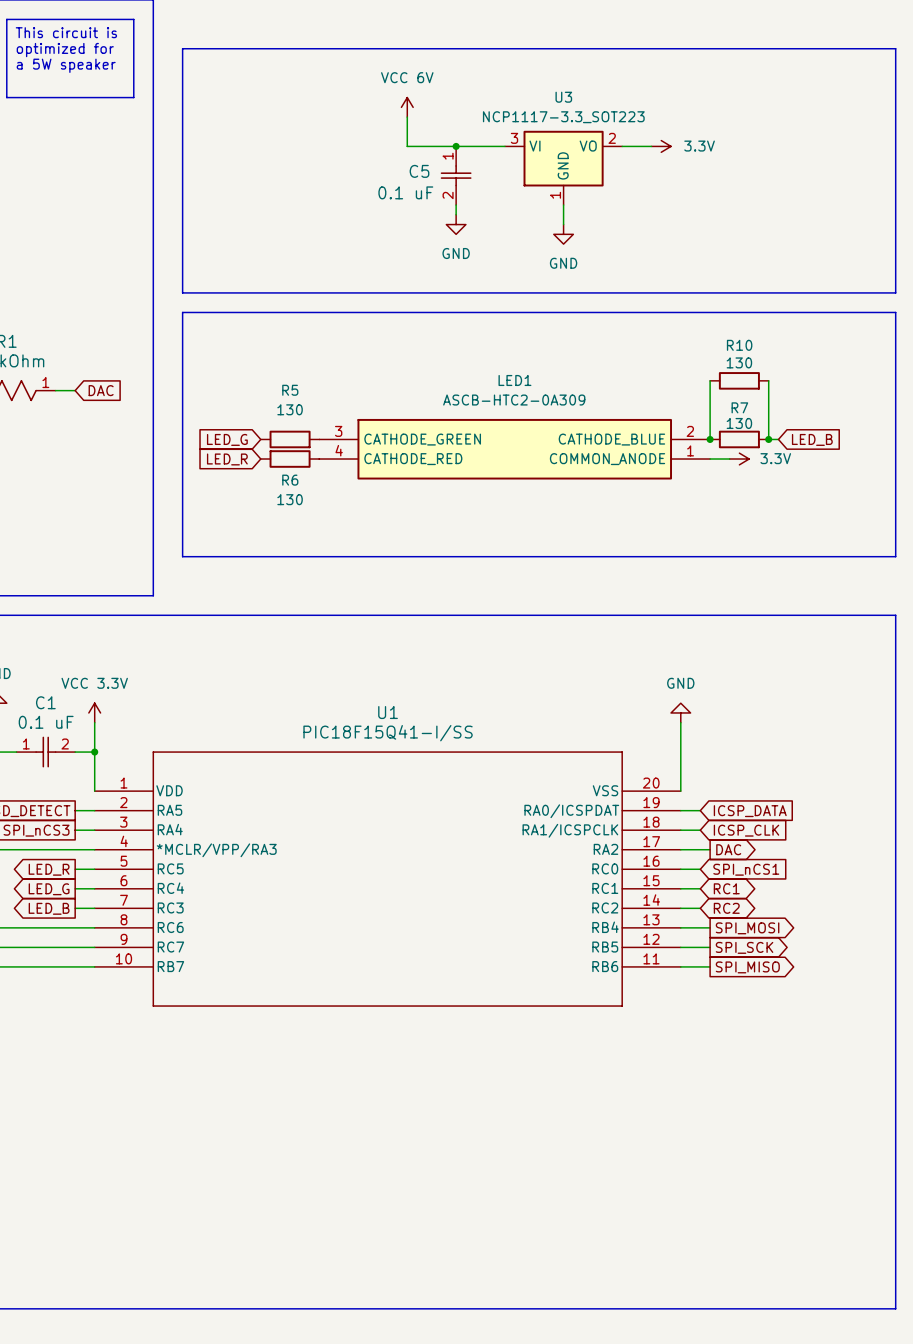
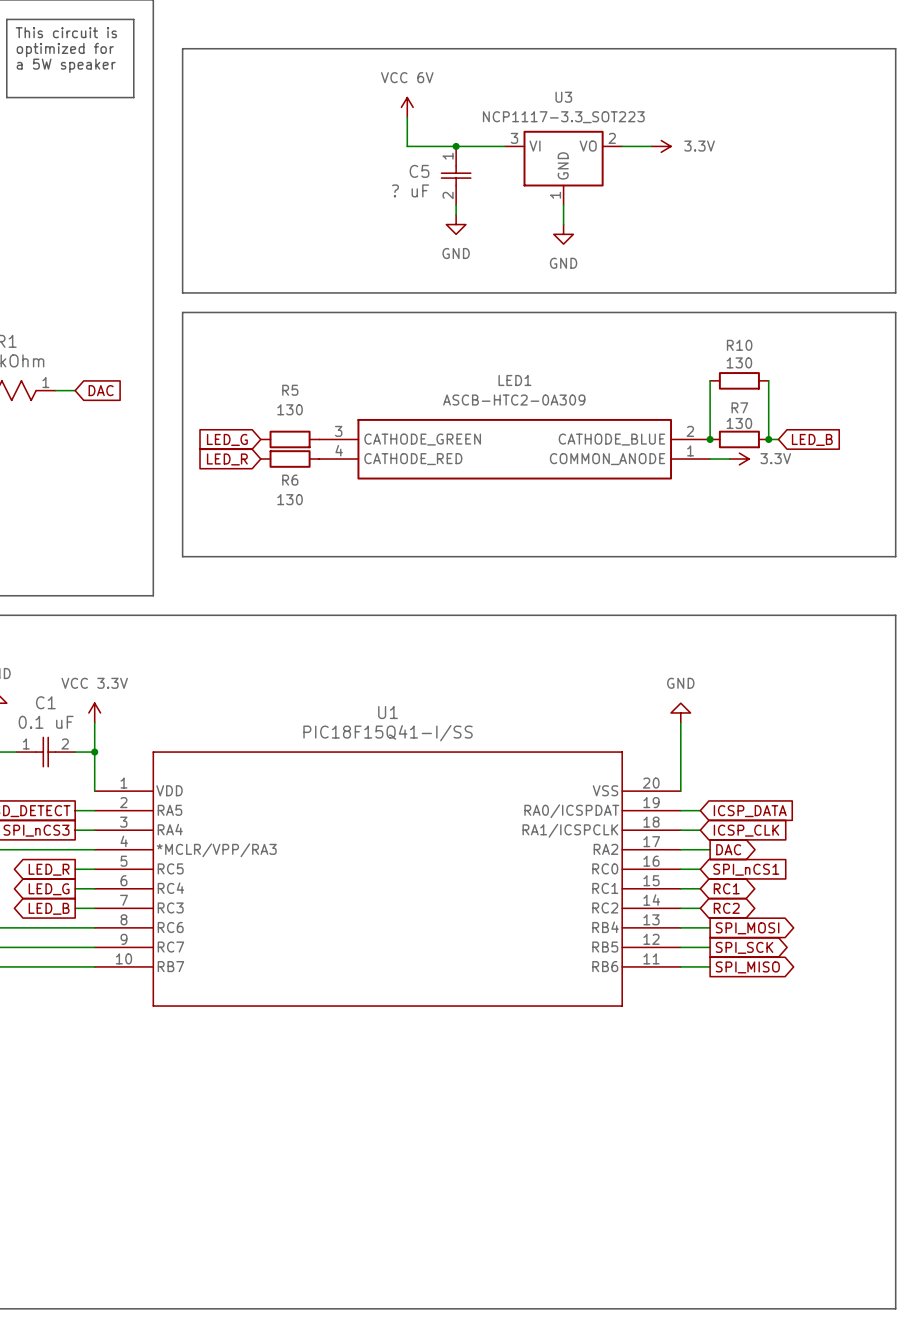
C5 value: 0.1 uF (405, 192) -> ? uF (410, 190)

